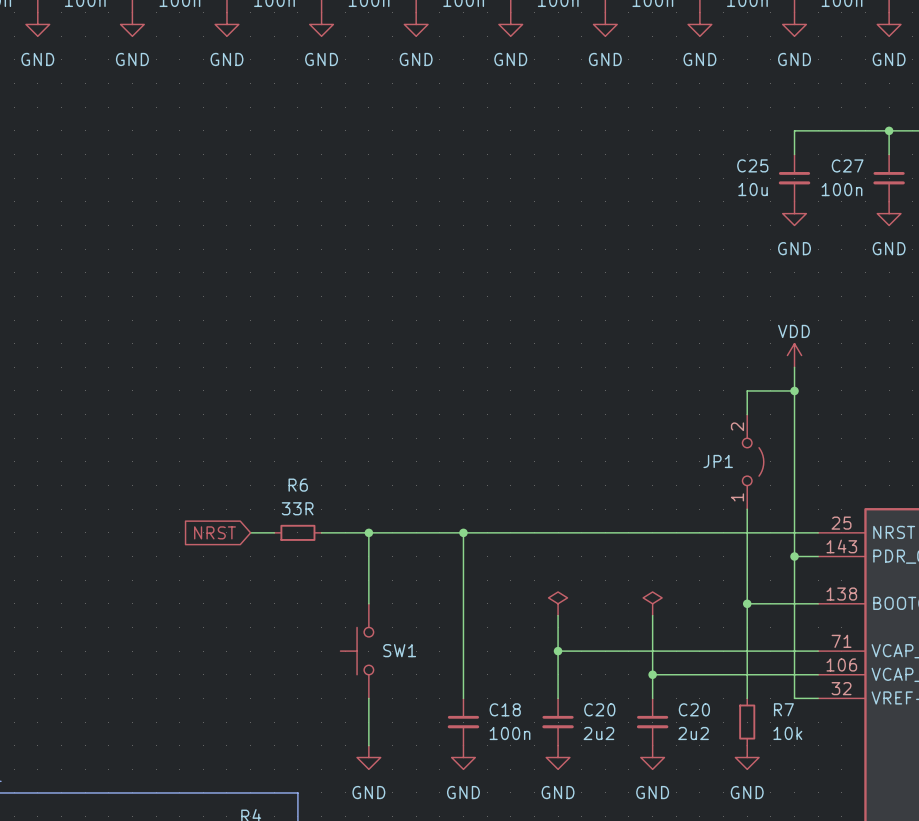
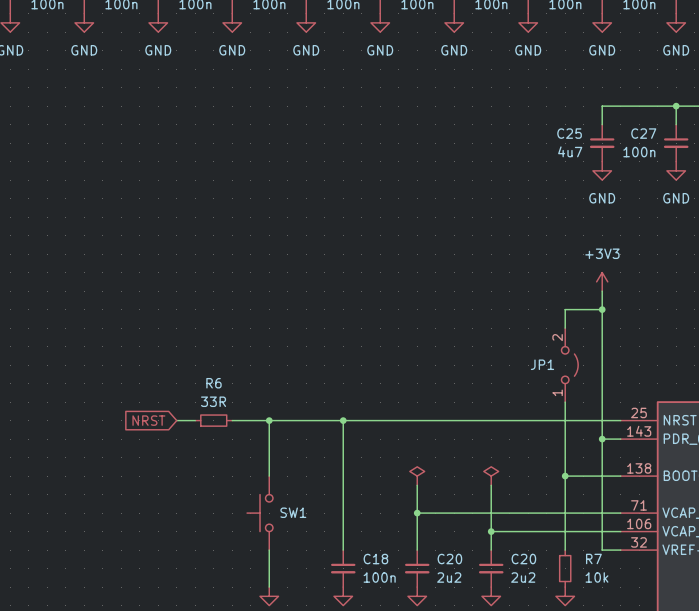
C25 value: 10u (753, 189) -> 4u7 (570, 151)
power symbol: VDD (794, 355) -> +3V3 (602, 281)

